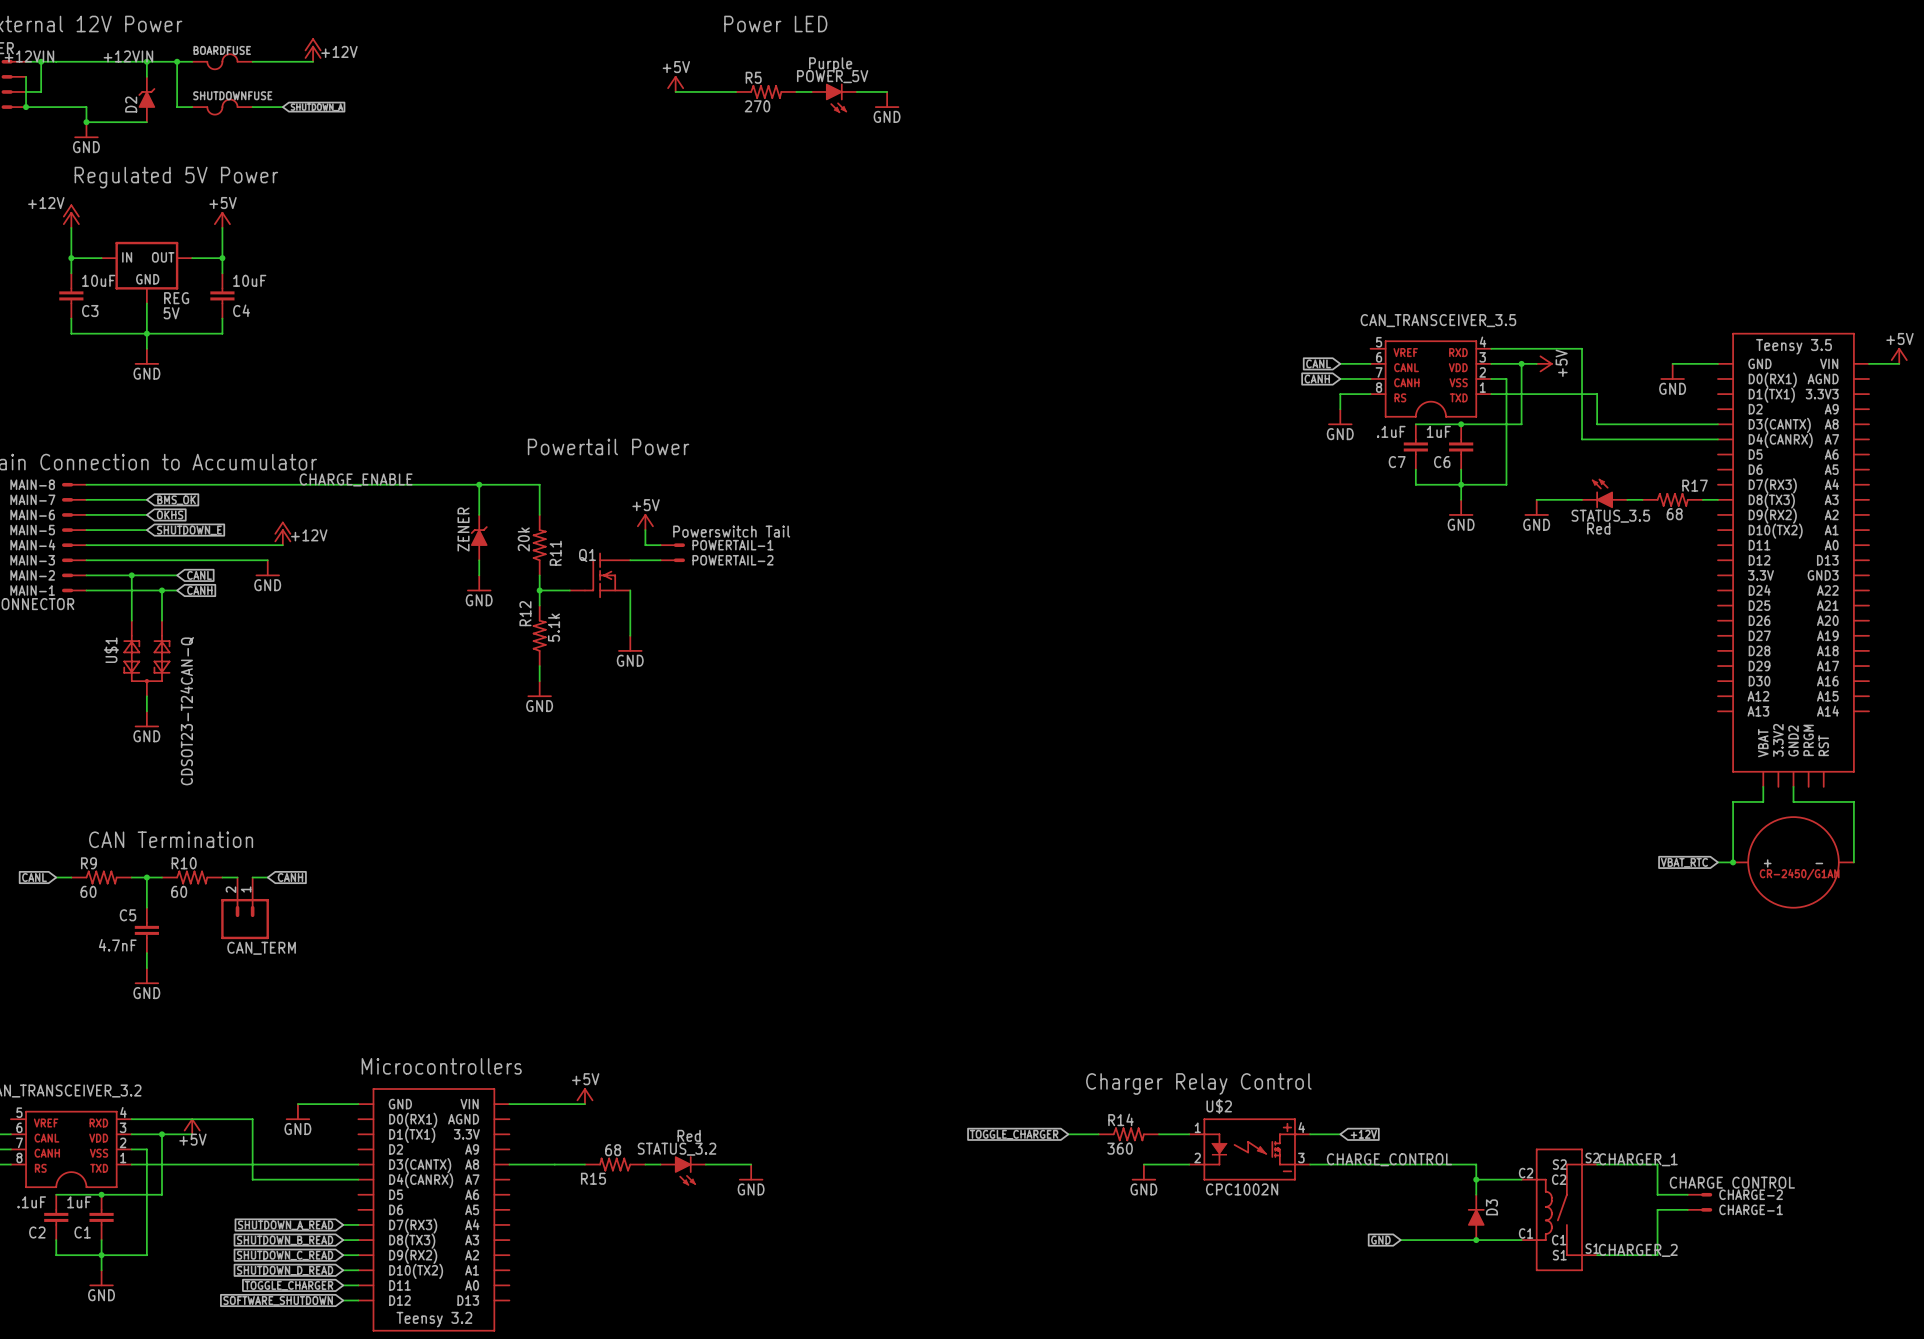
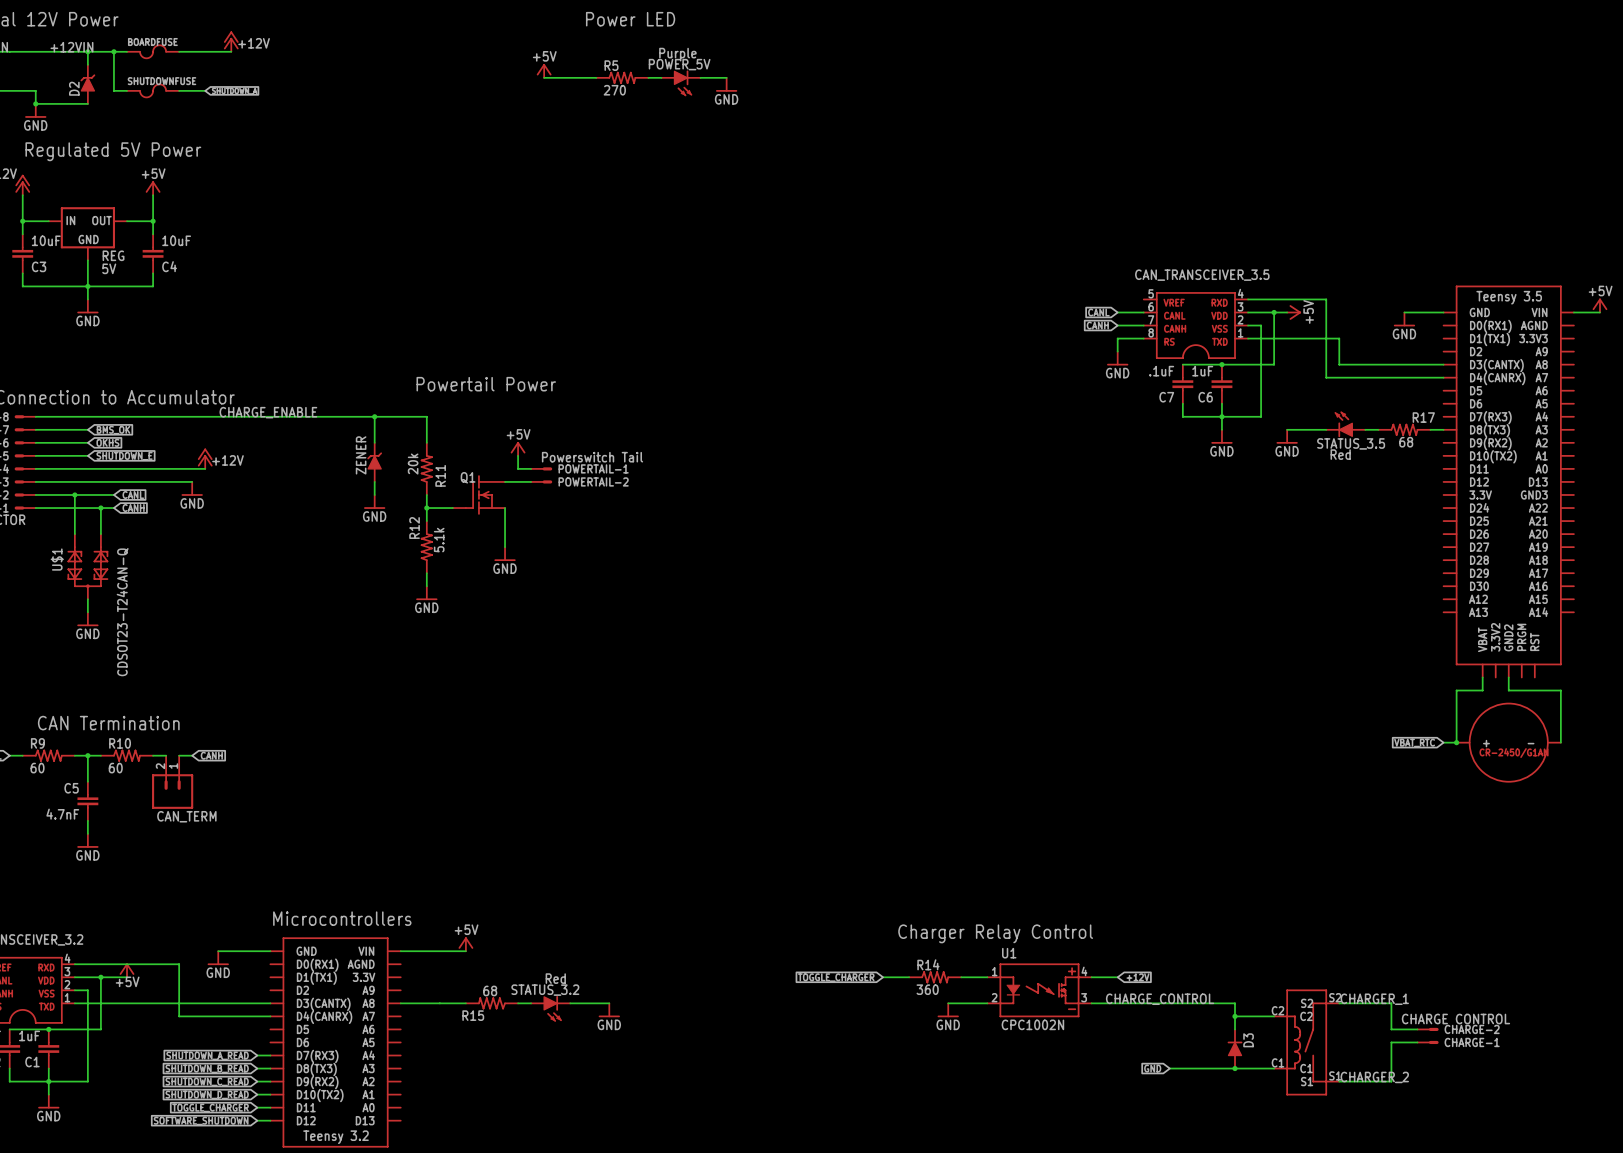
U$2 name: U$2 (1219, 1106) -> U1 (1009, 953)

